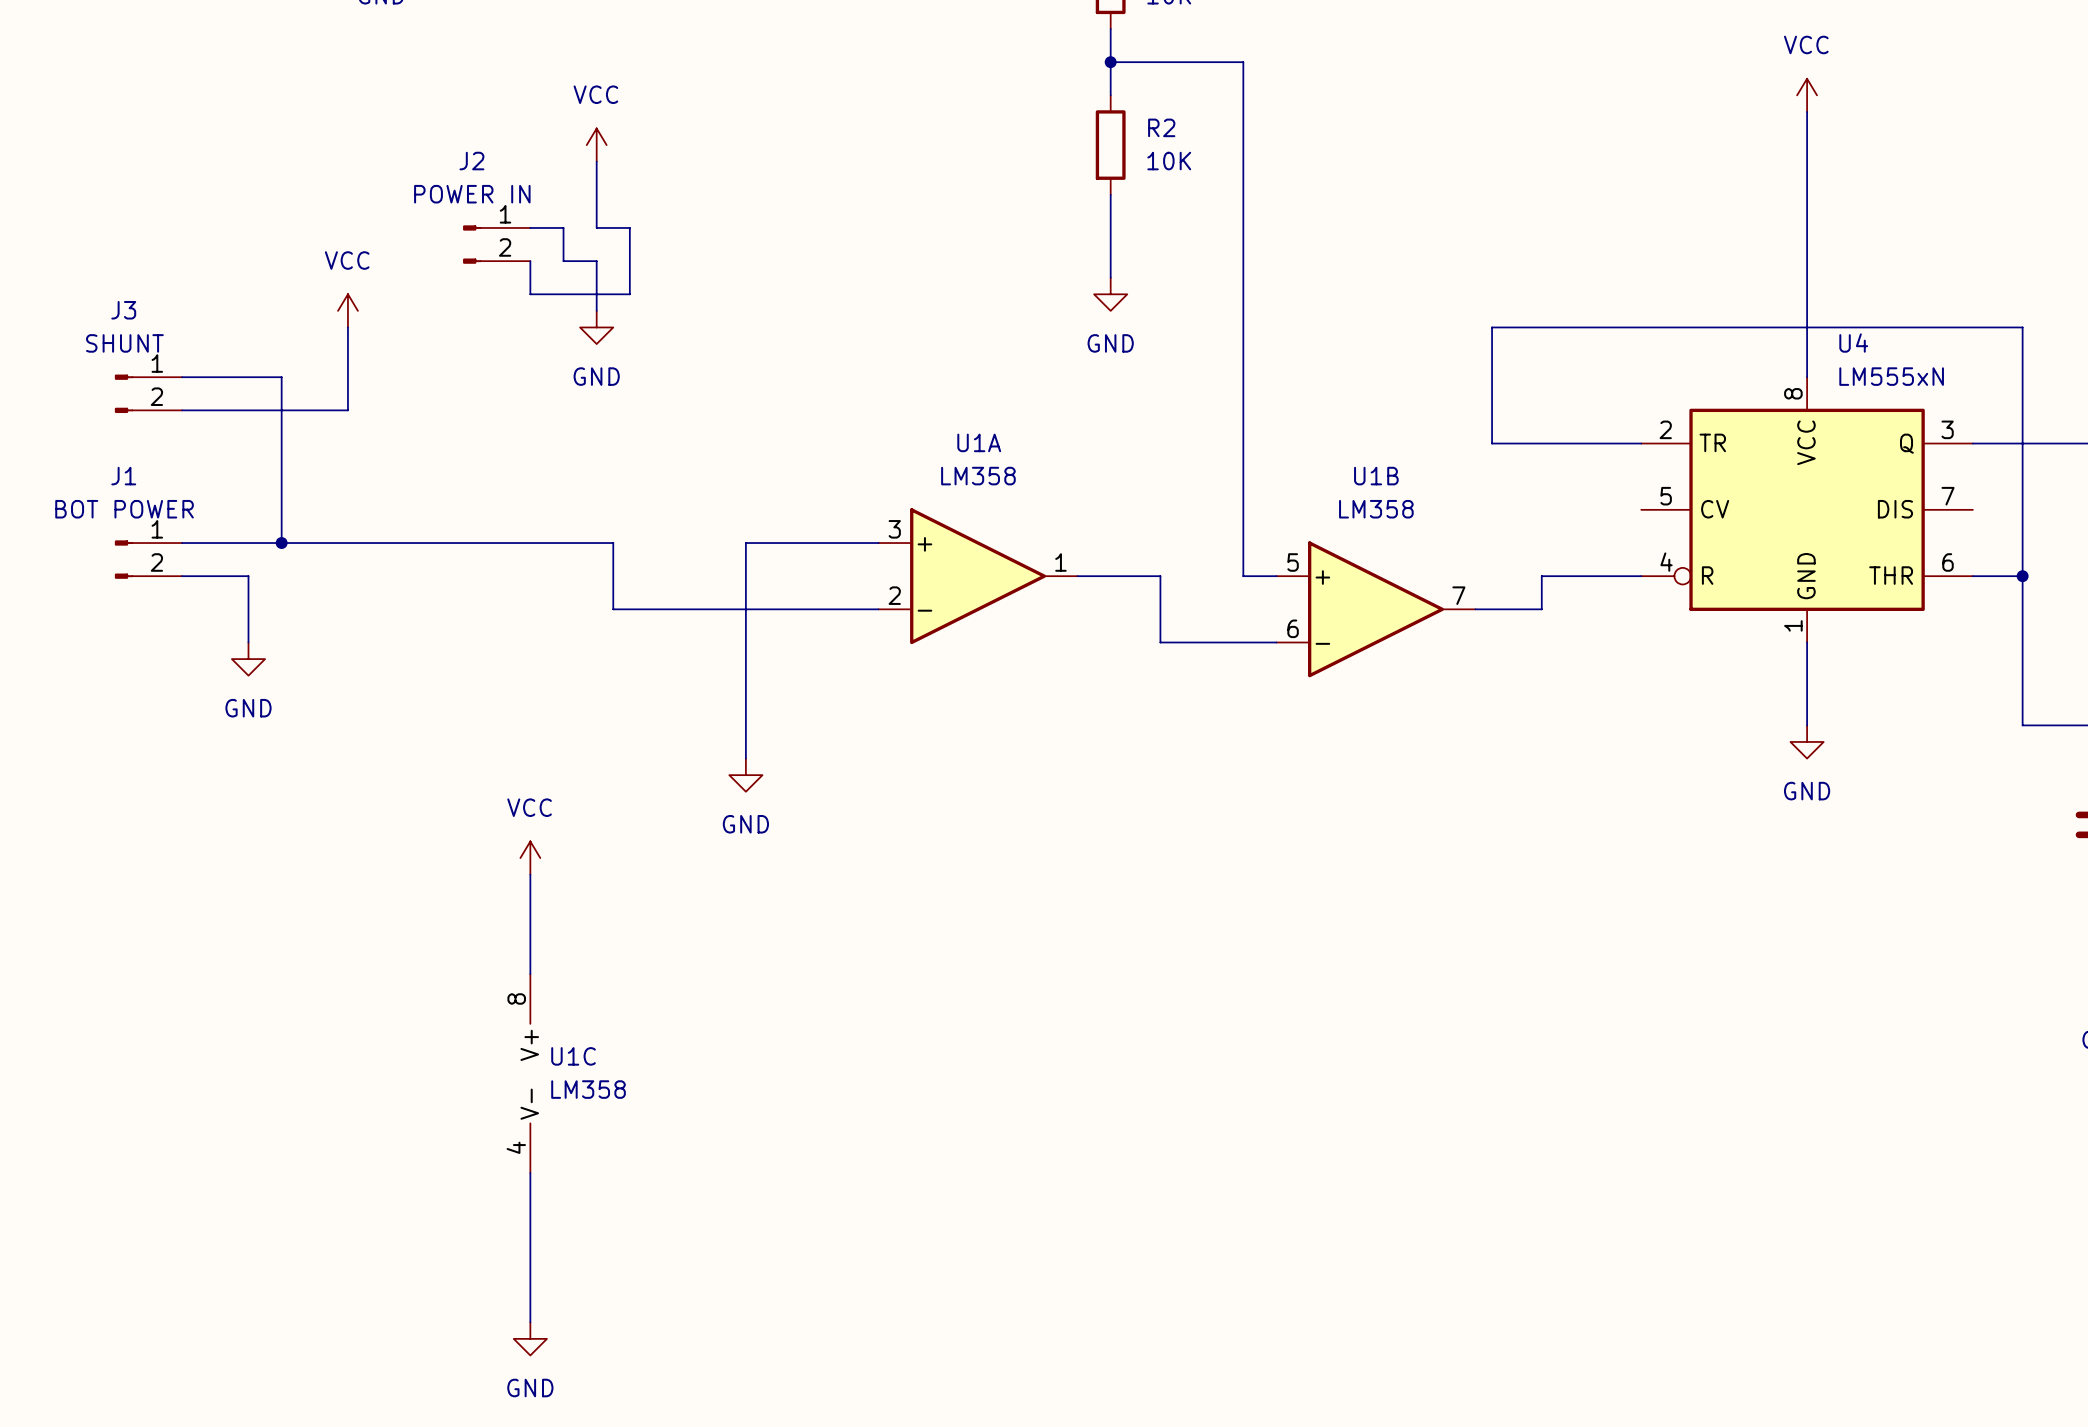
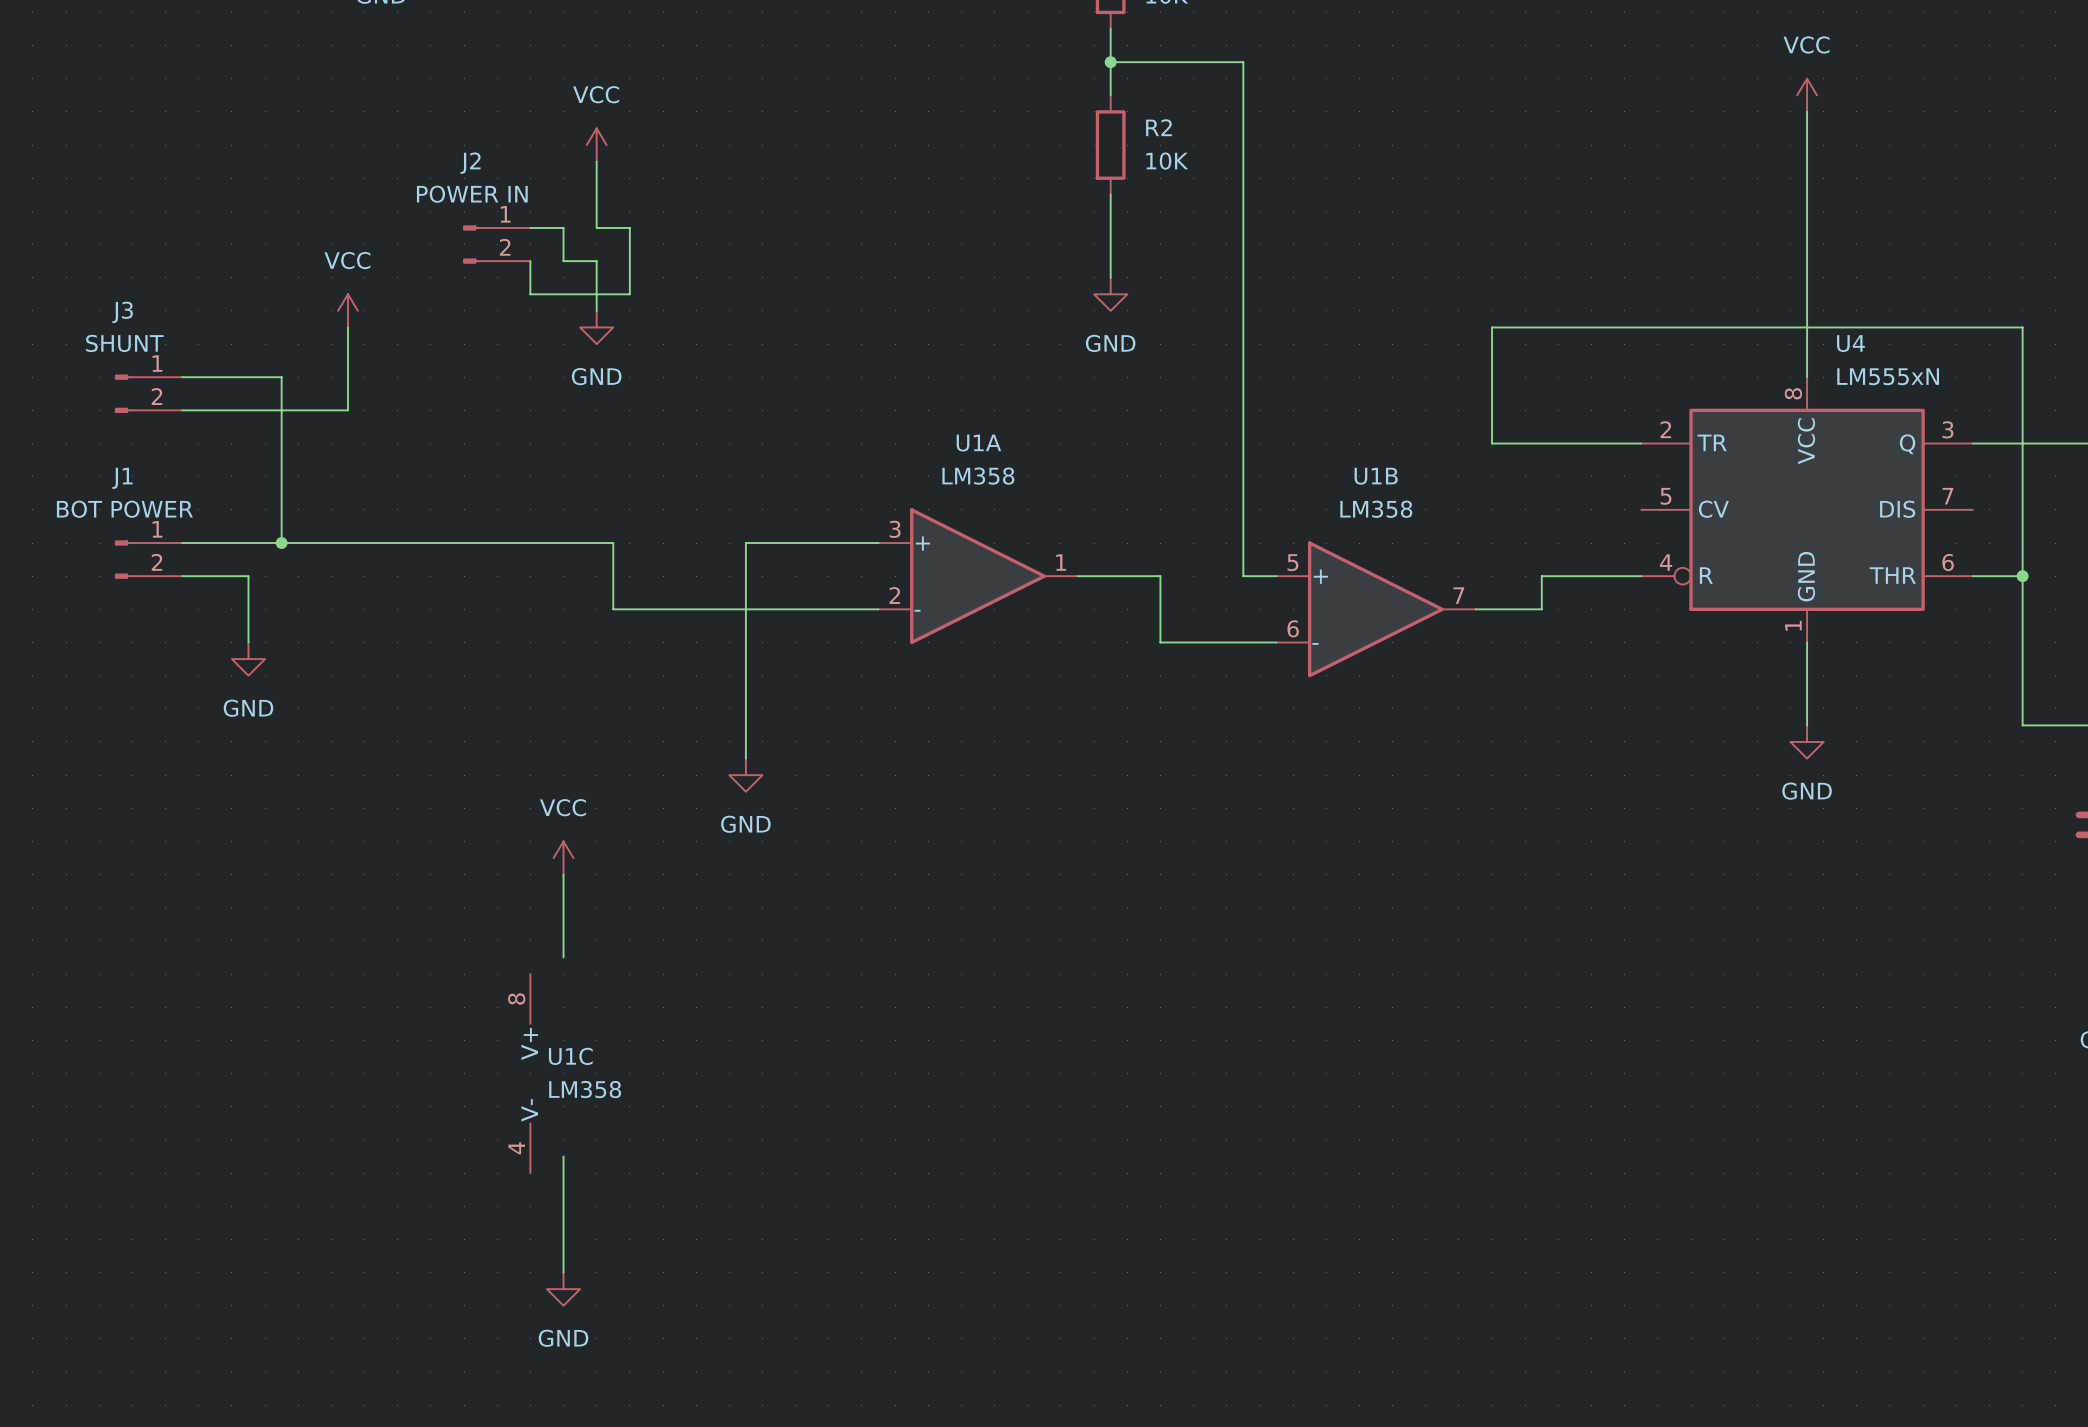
power symbol position: VCC (530, 858) -> VCC (563, 858)
wire: (530, 874) (530, 974) -> none
wire: none -> (563, 874) (563, 957)
wire: none -> (563, 1156) (563, 1272)
wire: (530, 1173) (530, 1322) -> none
power symbol position: GND (530, 1338) -> GND (563, 1289)

